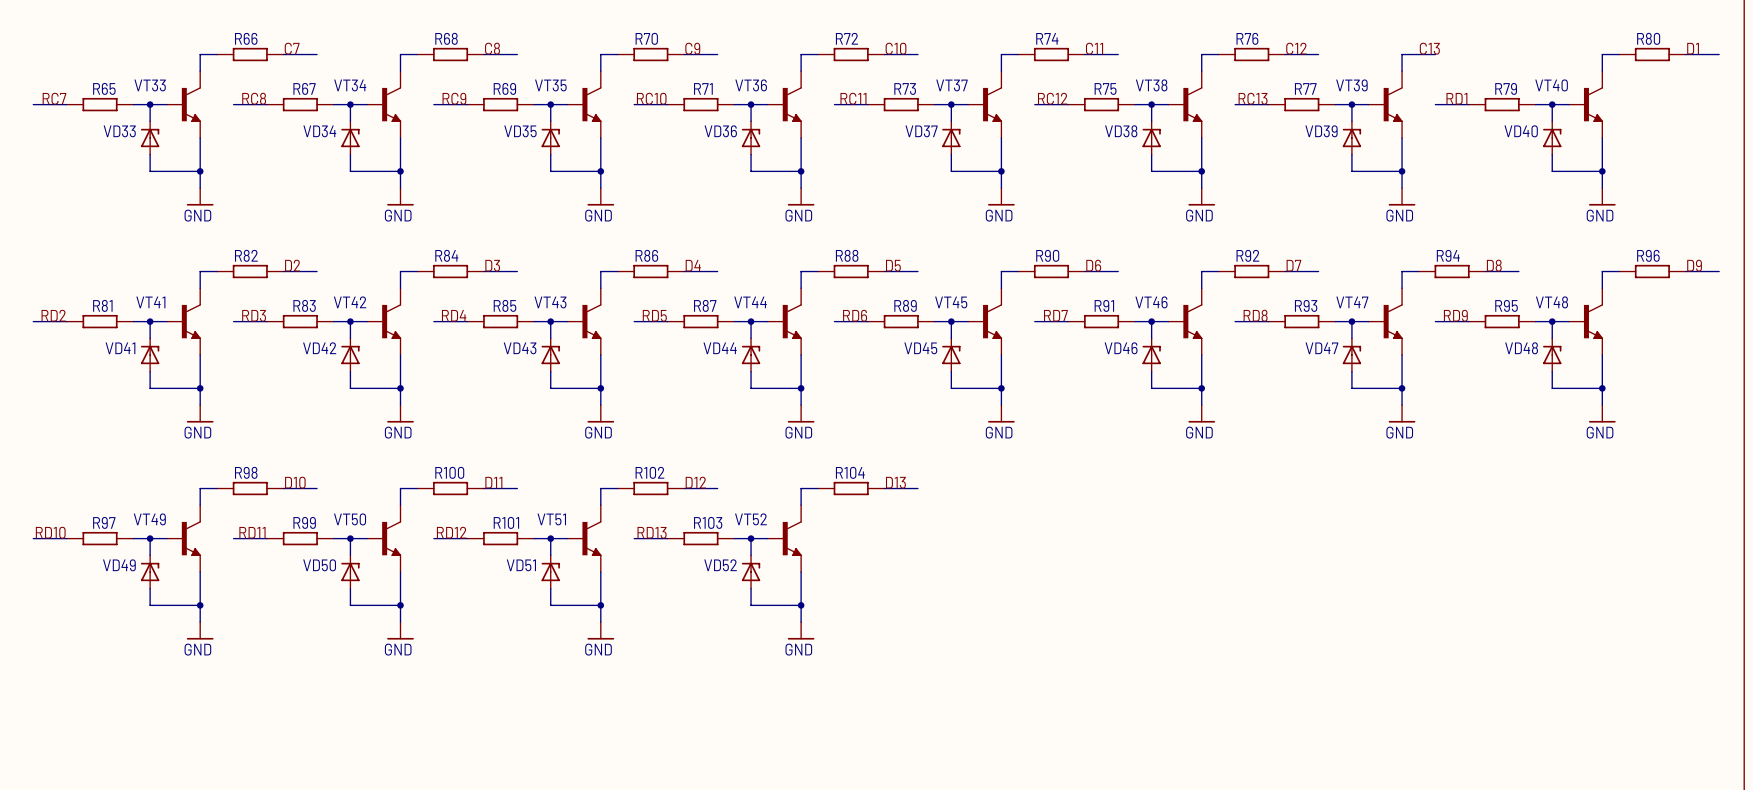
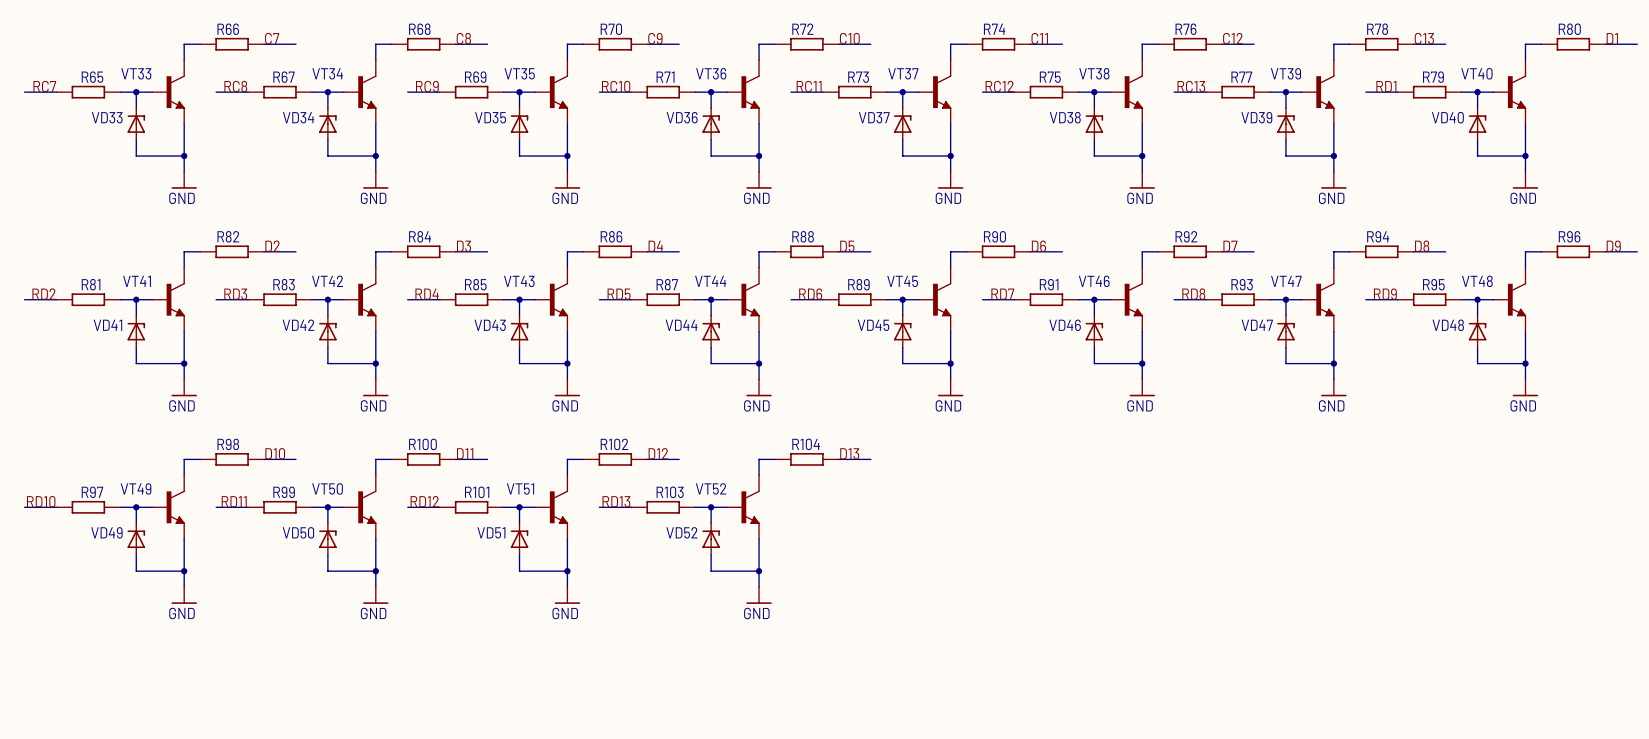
label position: C13 (1429, 48) -> C13 (1424, 38)
R78: none -> (1381, 44)
wire: none -> (1413, 44) (1445, 44)

